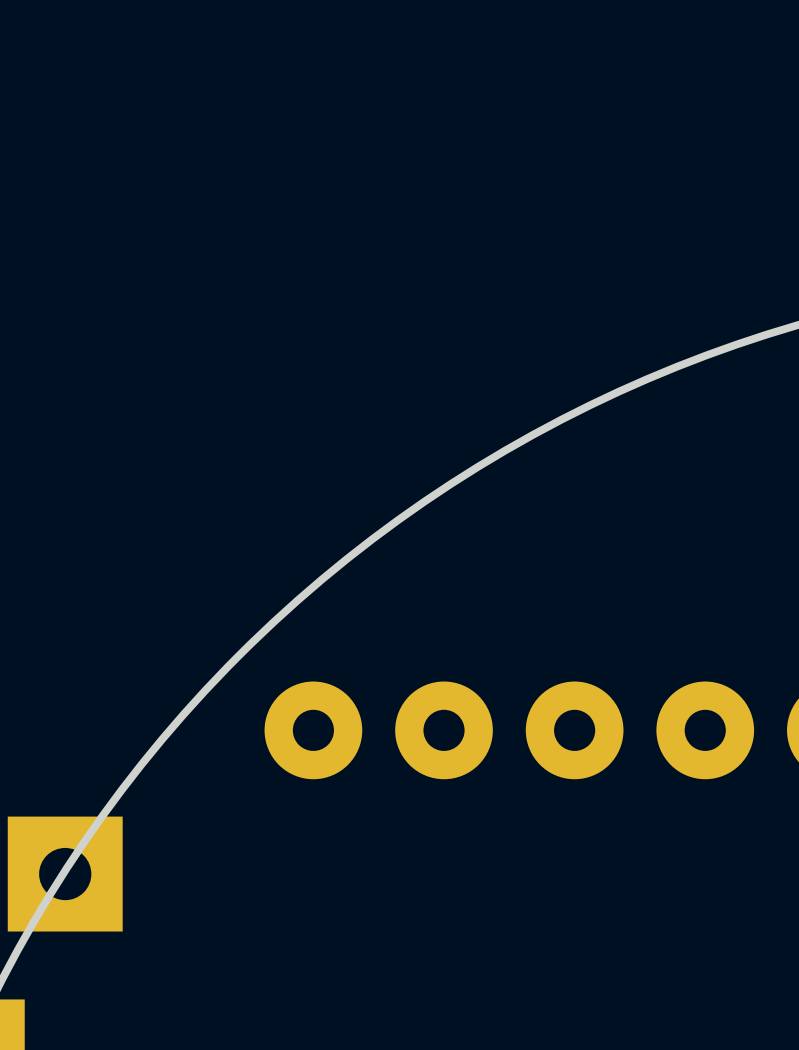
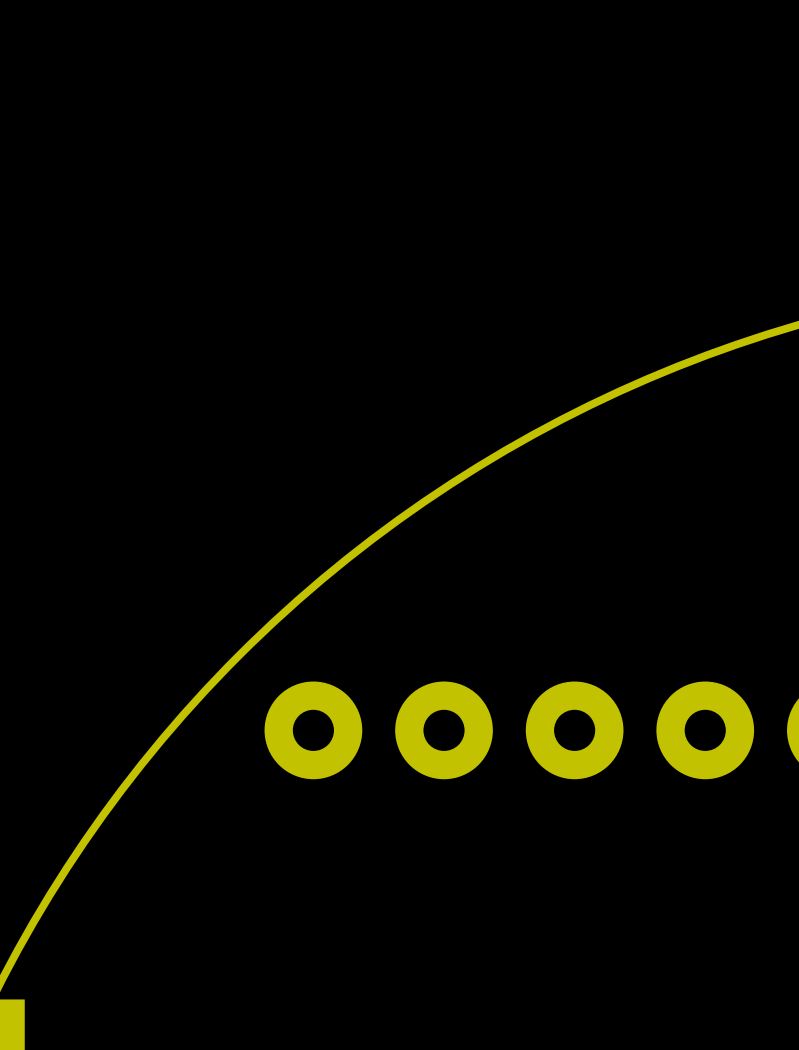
part: (65, 874) -> none

